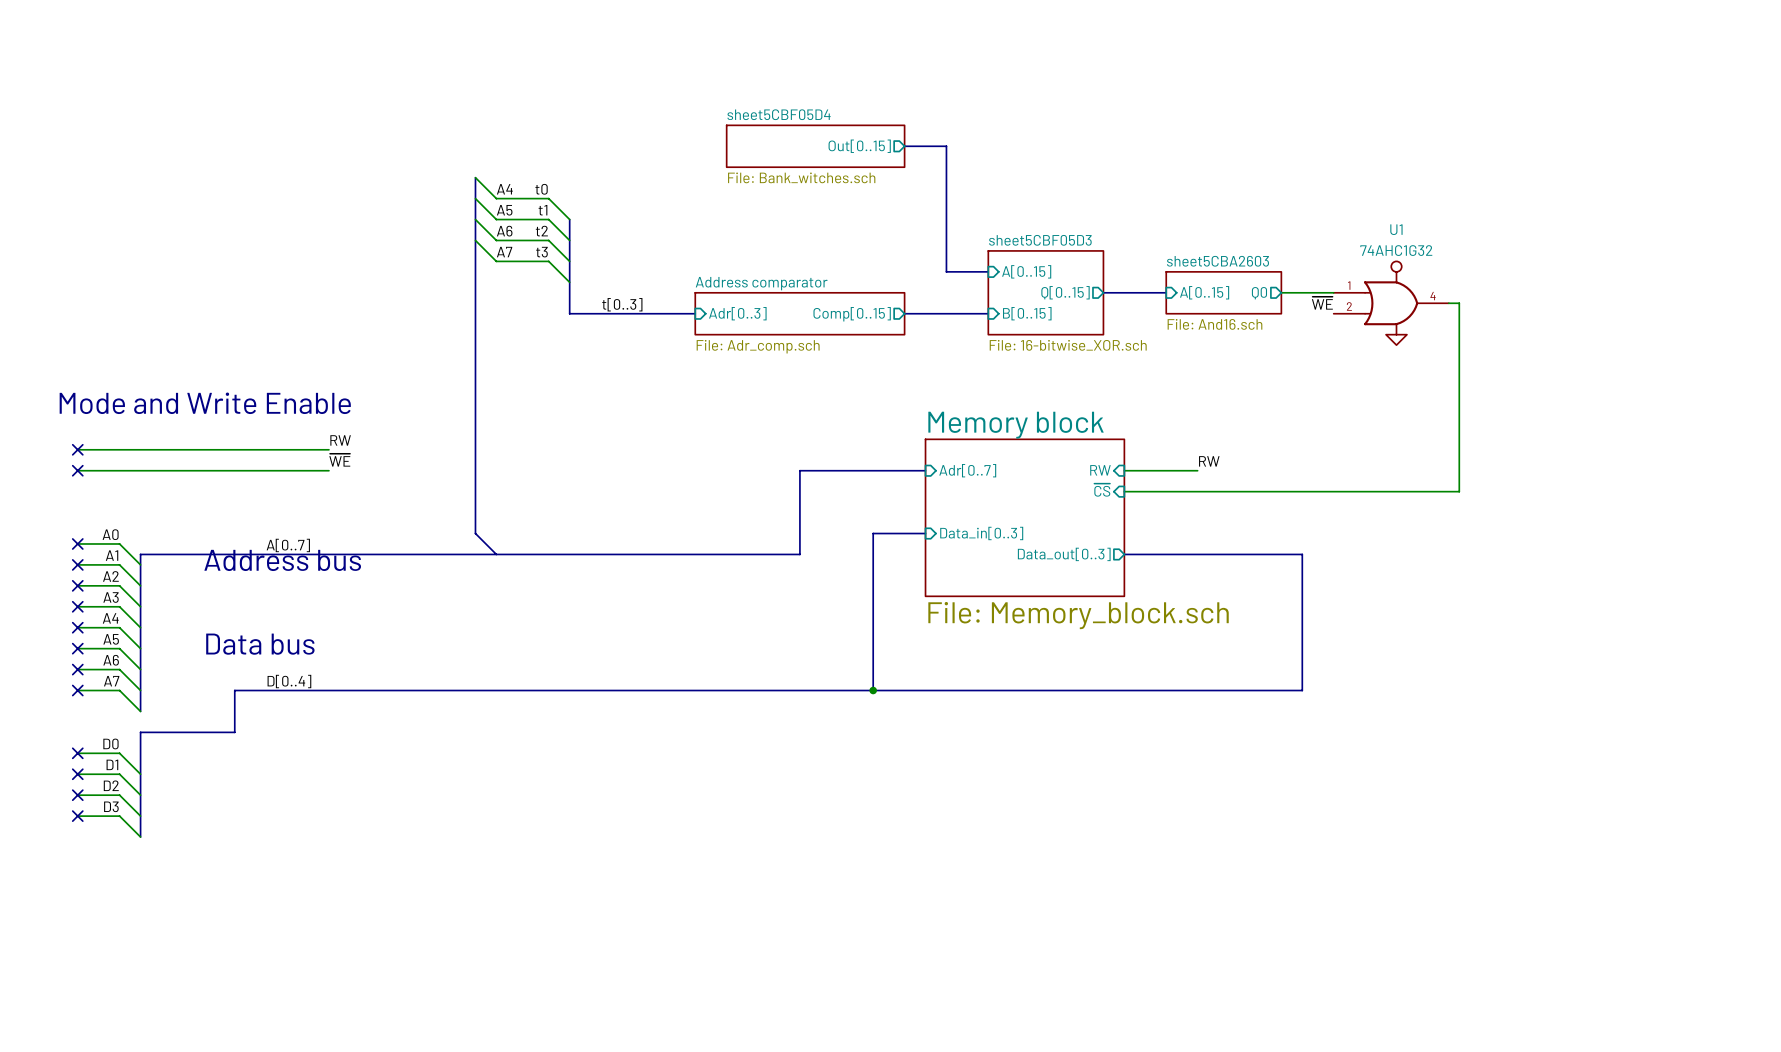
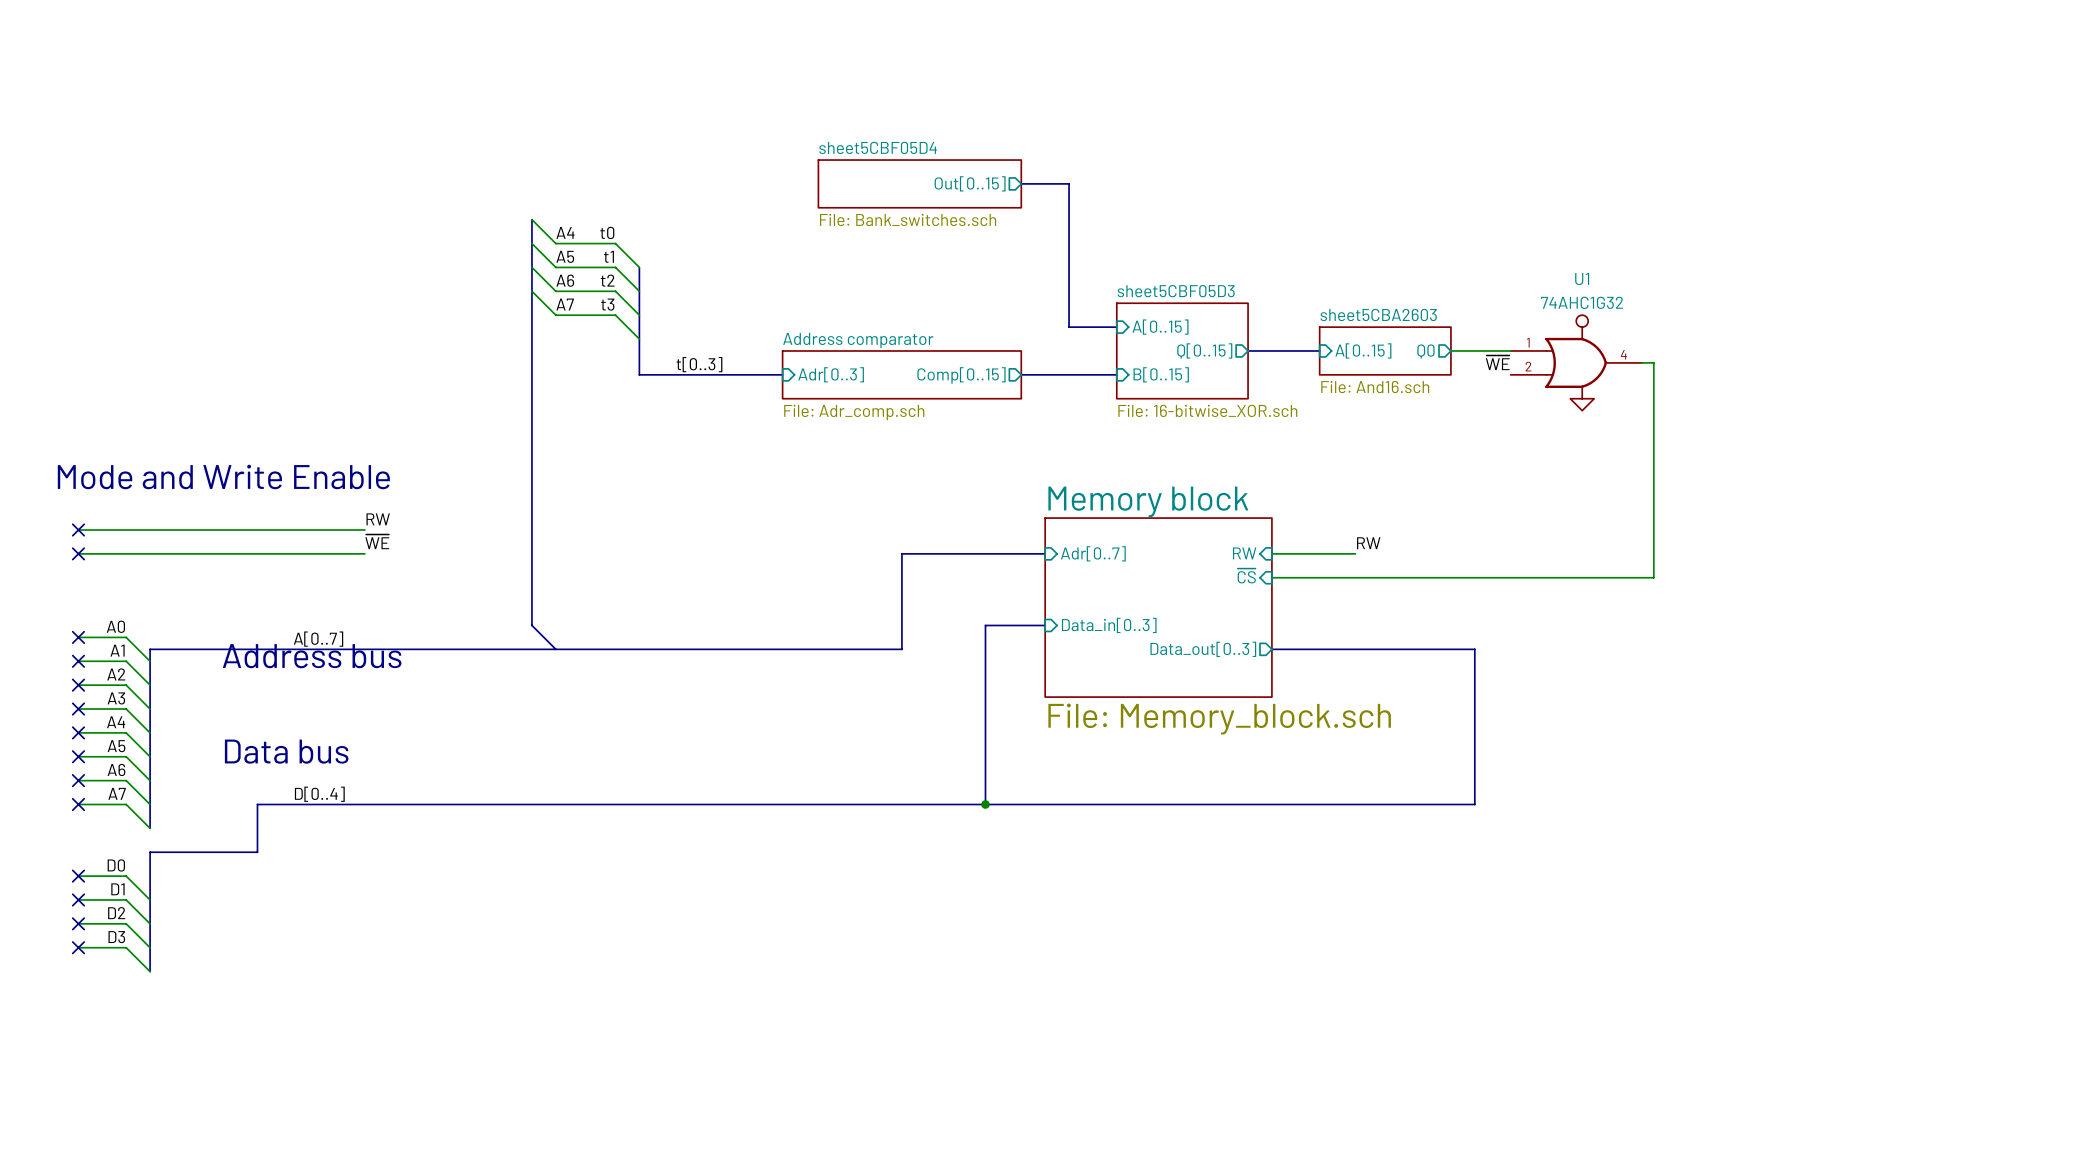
sheet sheet5CBF05D4 value: File: Bank_witches.sch (801, 177) -> File: Bank_switches.sch (908, 219)

